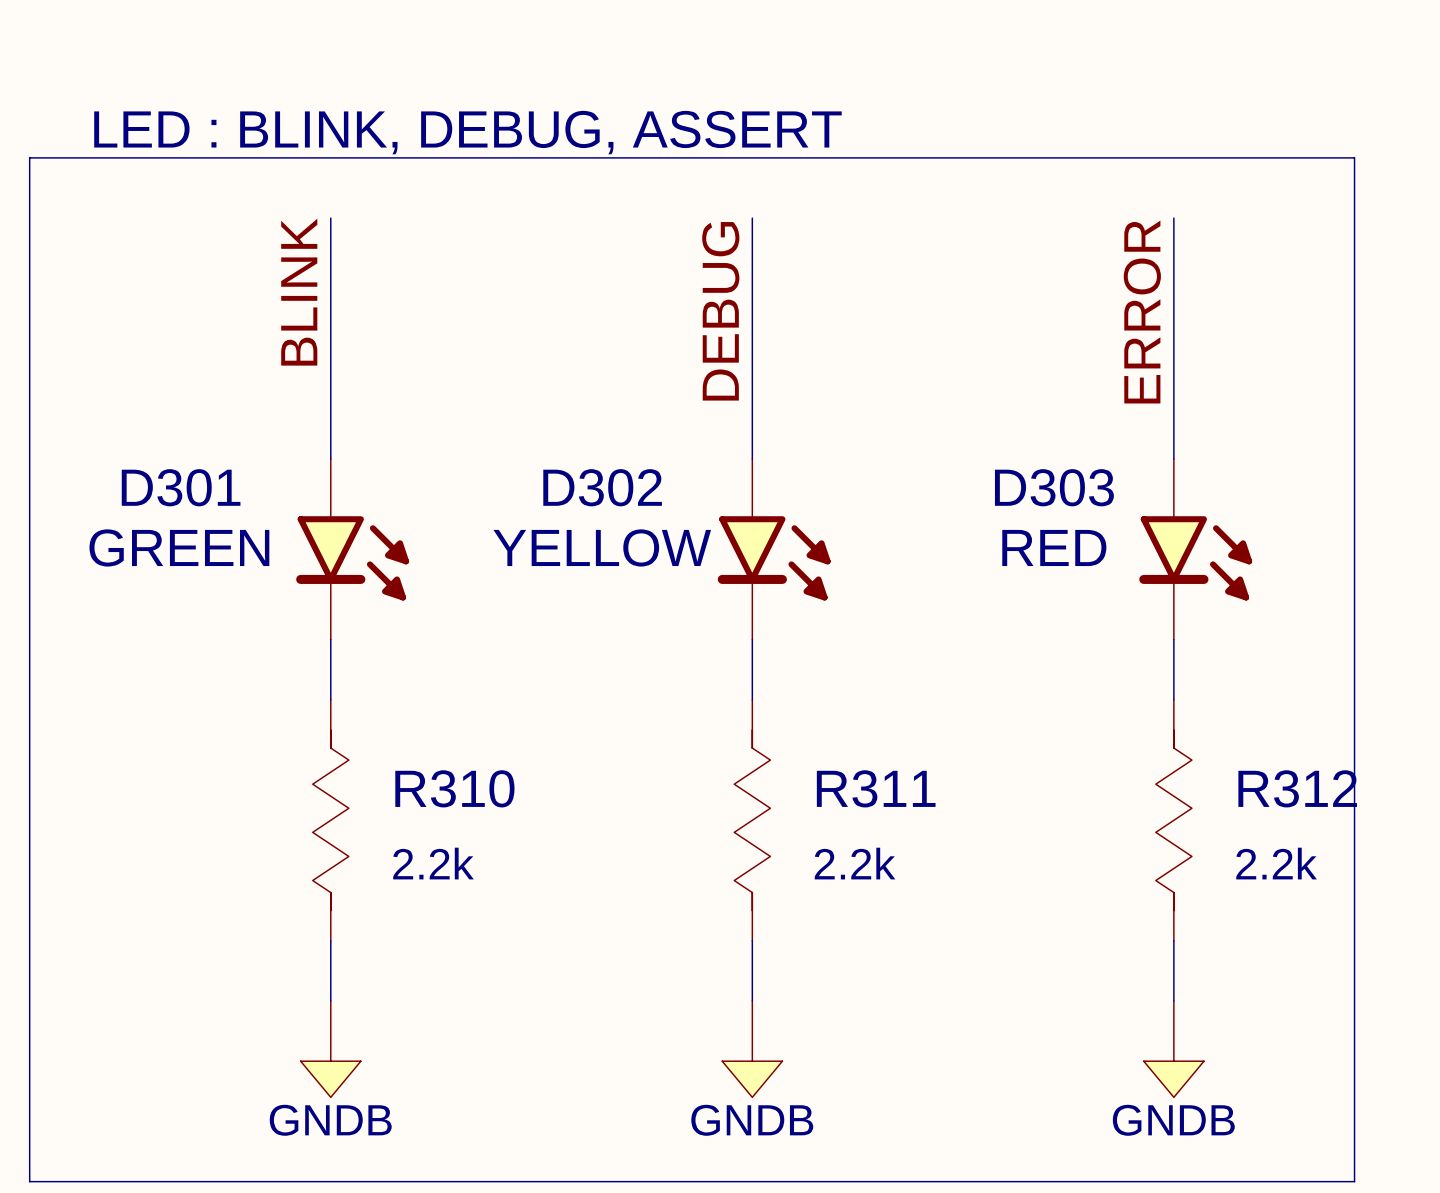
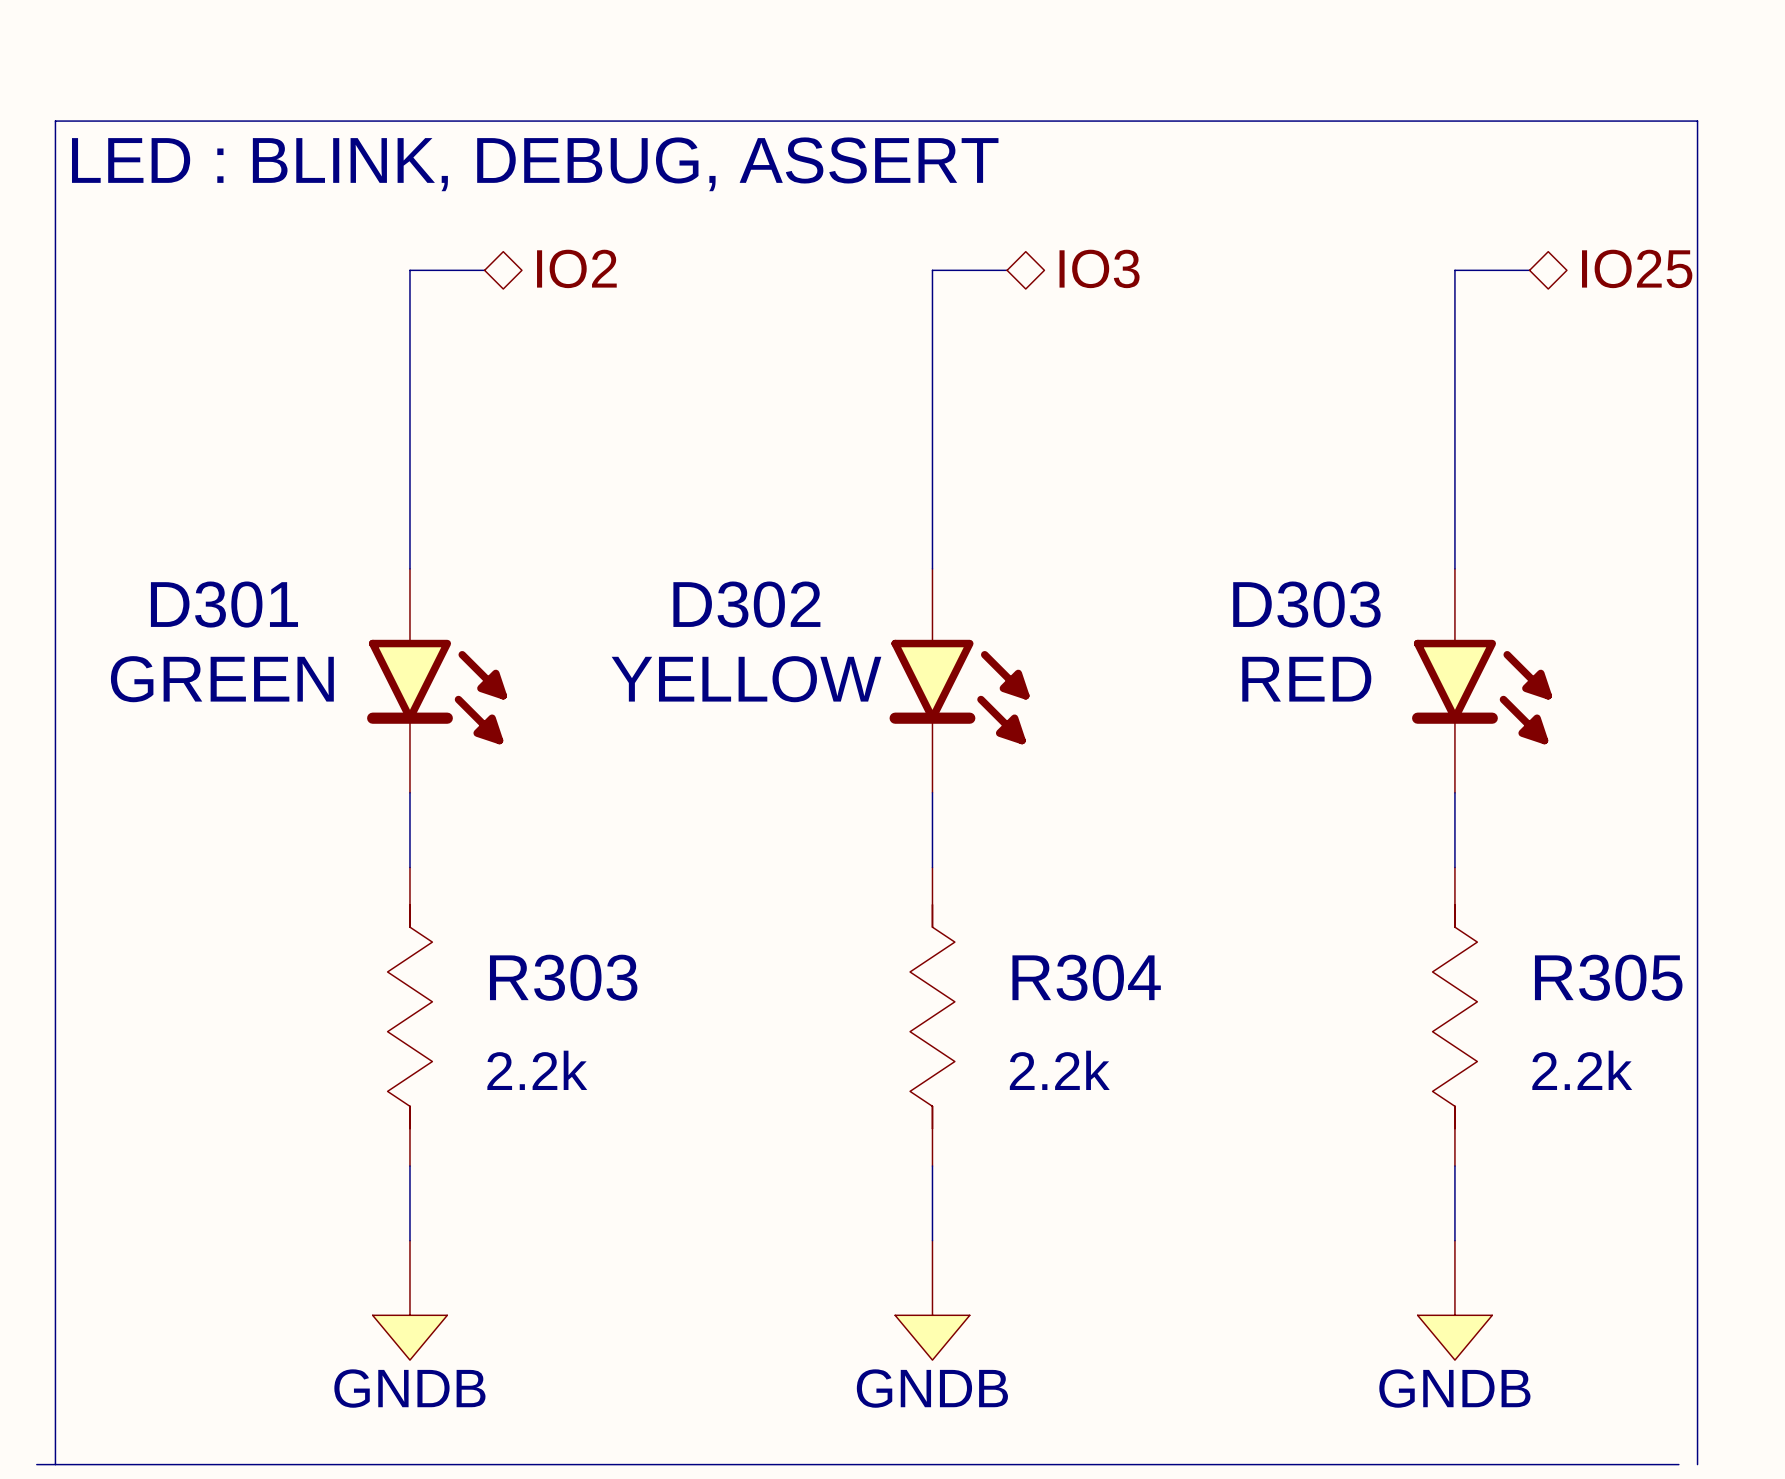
text position: LED : BLINK, DEBUG, ASSERT (467, 132) -> LED : BLINK, DEBUG, ASSERT (535, 164)
hierarchical label: none -> IO2 (576, 268)
hierarchical label: none -> IO3 (1099, 268)
hierarchical label: none -> IO25 (1637, 268)
wire: none -> (409, 270) (484, 270)
wire: none -> (932, 270) (1007, 270)
wire: none -> (1454, 270) (1529, 270)
label: BLINK (299, 292) -> none
label: DEBUG (720, 311) -> none
label: ERROR (1142, 312) -> none
R310 name: R310 (454, 788) -> R303 (563, 977)
R311 name: R311 (876, 788) -> R304 (1086, 977)
R312 name: R312 (1297, 788) -> R305 (1608, 977)
line: (29, 1181) (29, 157) (1354, 157) (1354, 1181) -> none
line: none -> (55, 1464) (55, 121) (1697, 121) (1697, 1464)

